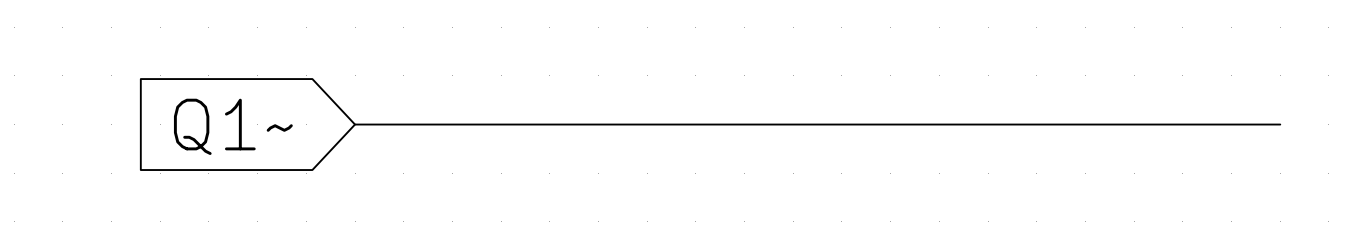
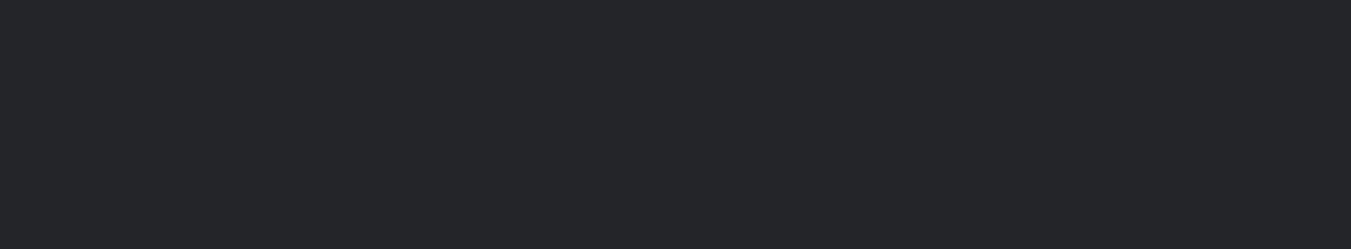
wire: (355, 124) (1280, 124) -> none
global label: Q1~ (233, 126) -> none

